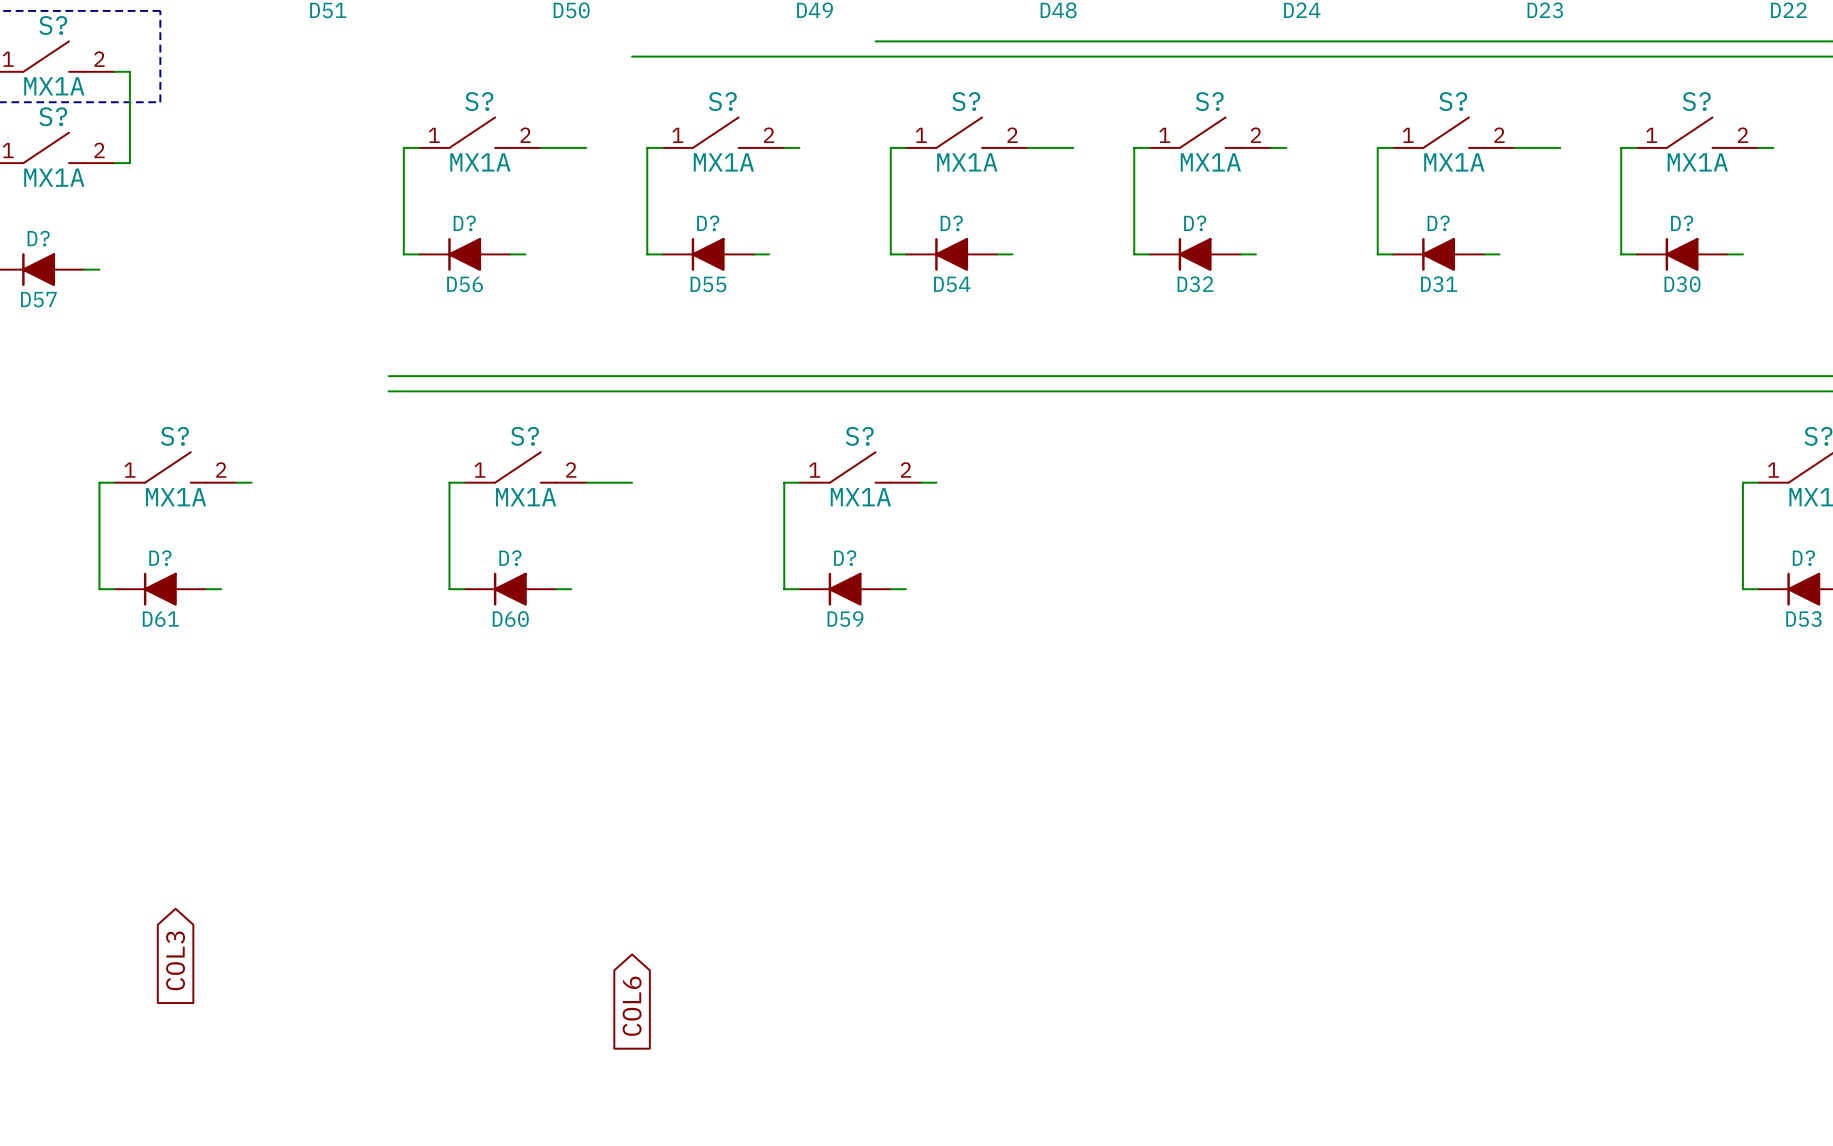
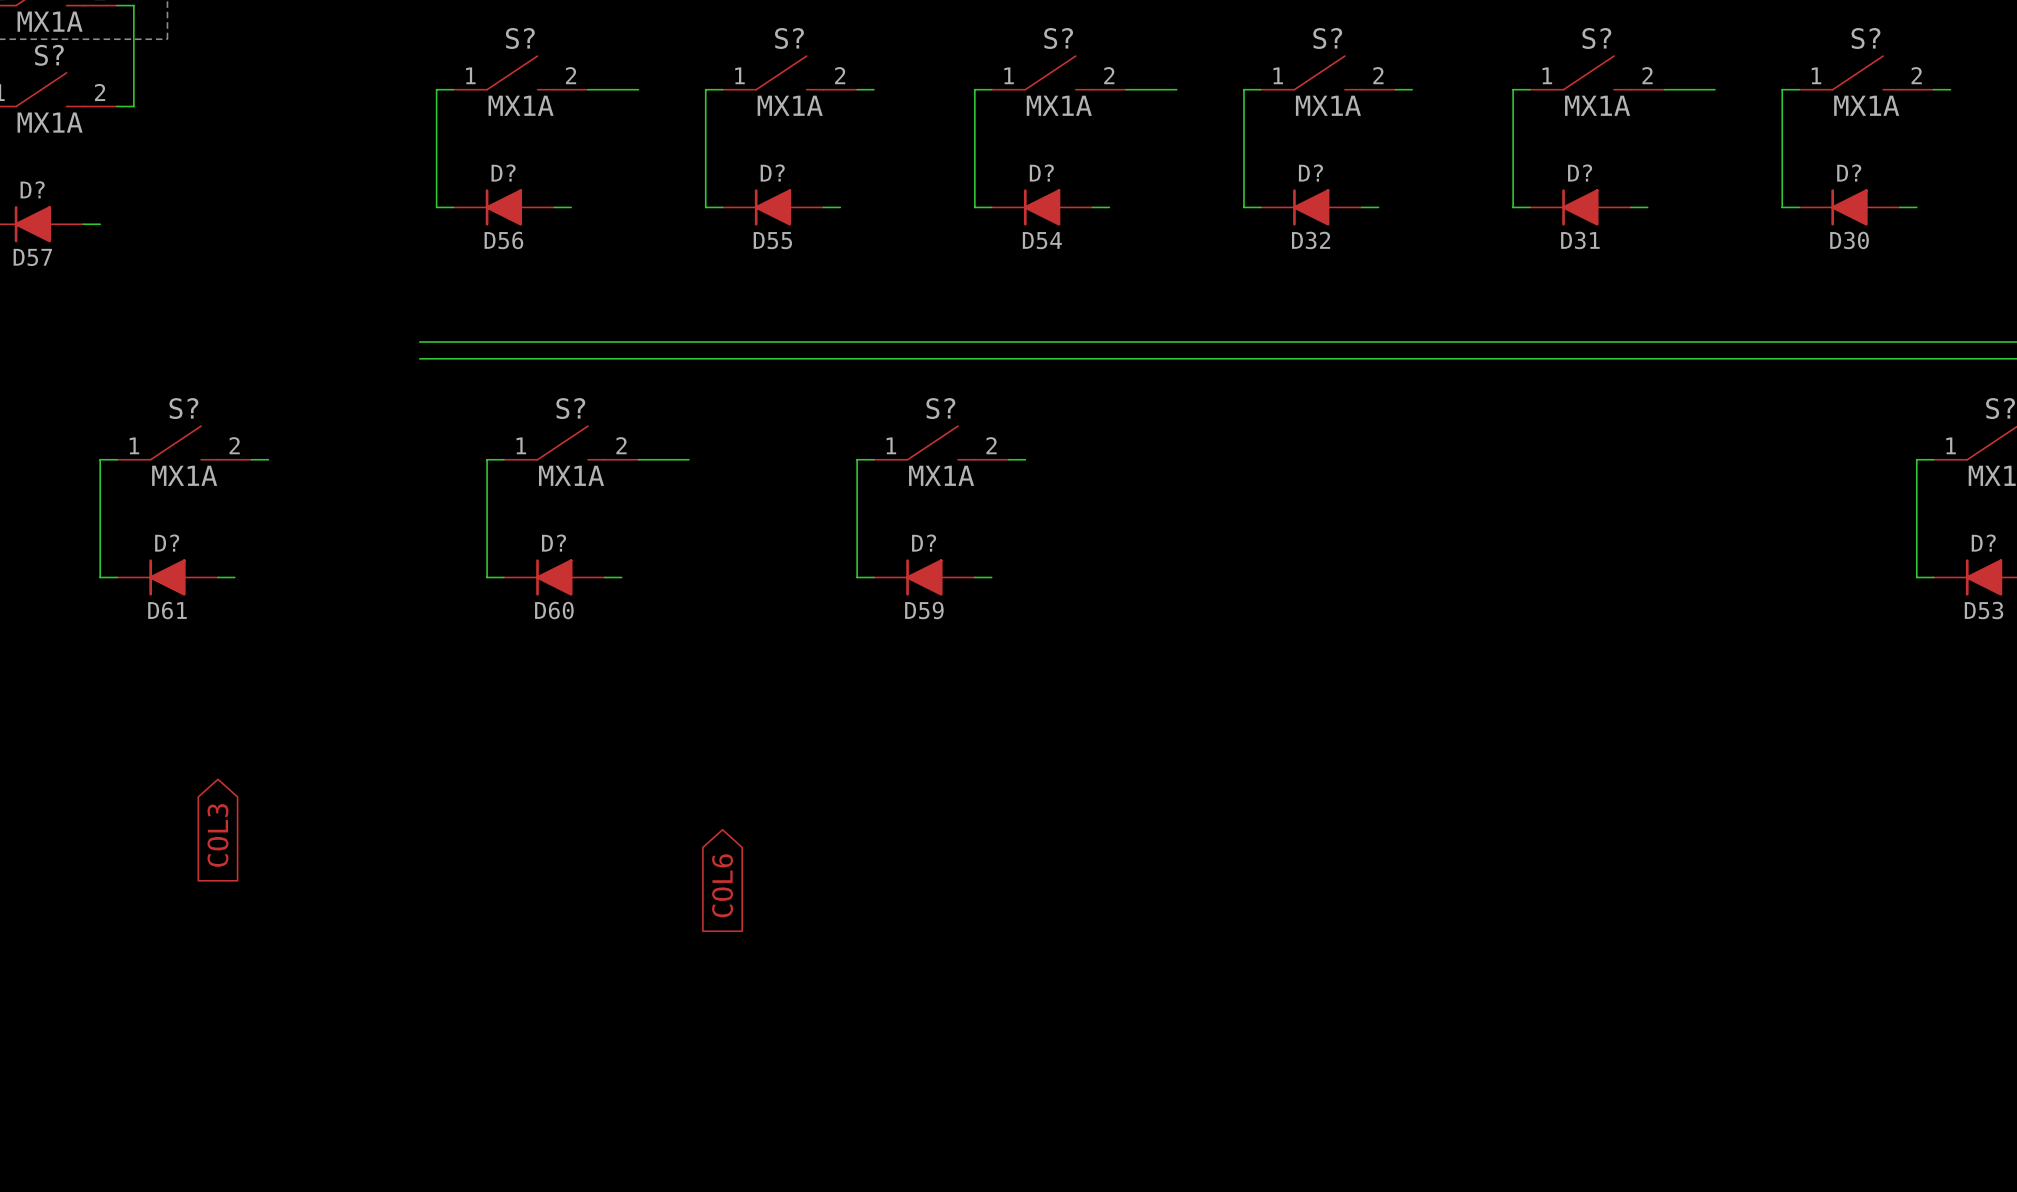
global label position: COL3 (175, 960) -> COL3 (217, 835)
global label position: COL6 (632, 1006) -> COL6 (722, 885)

